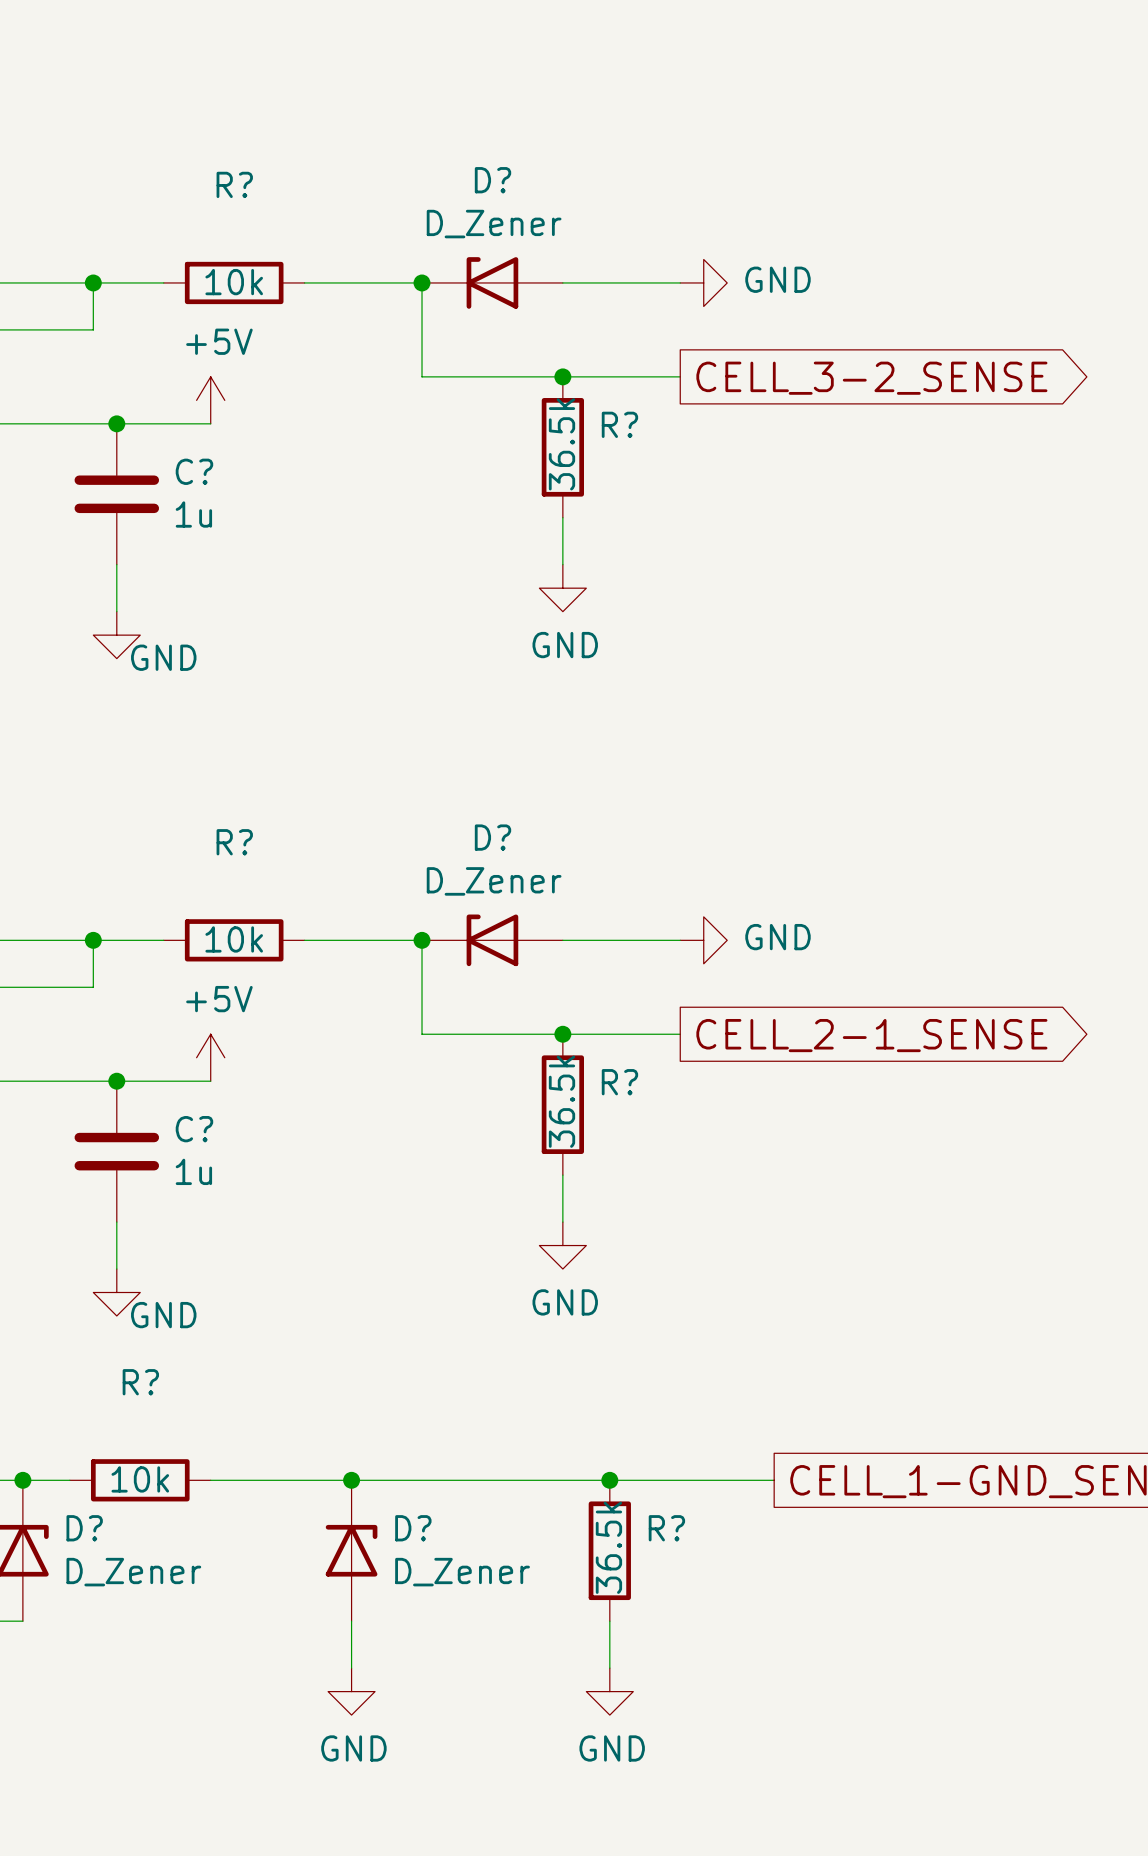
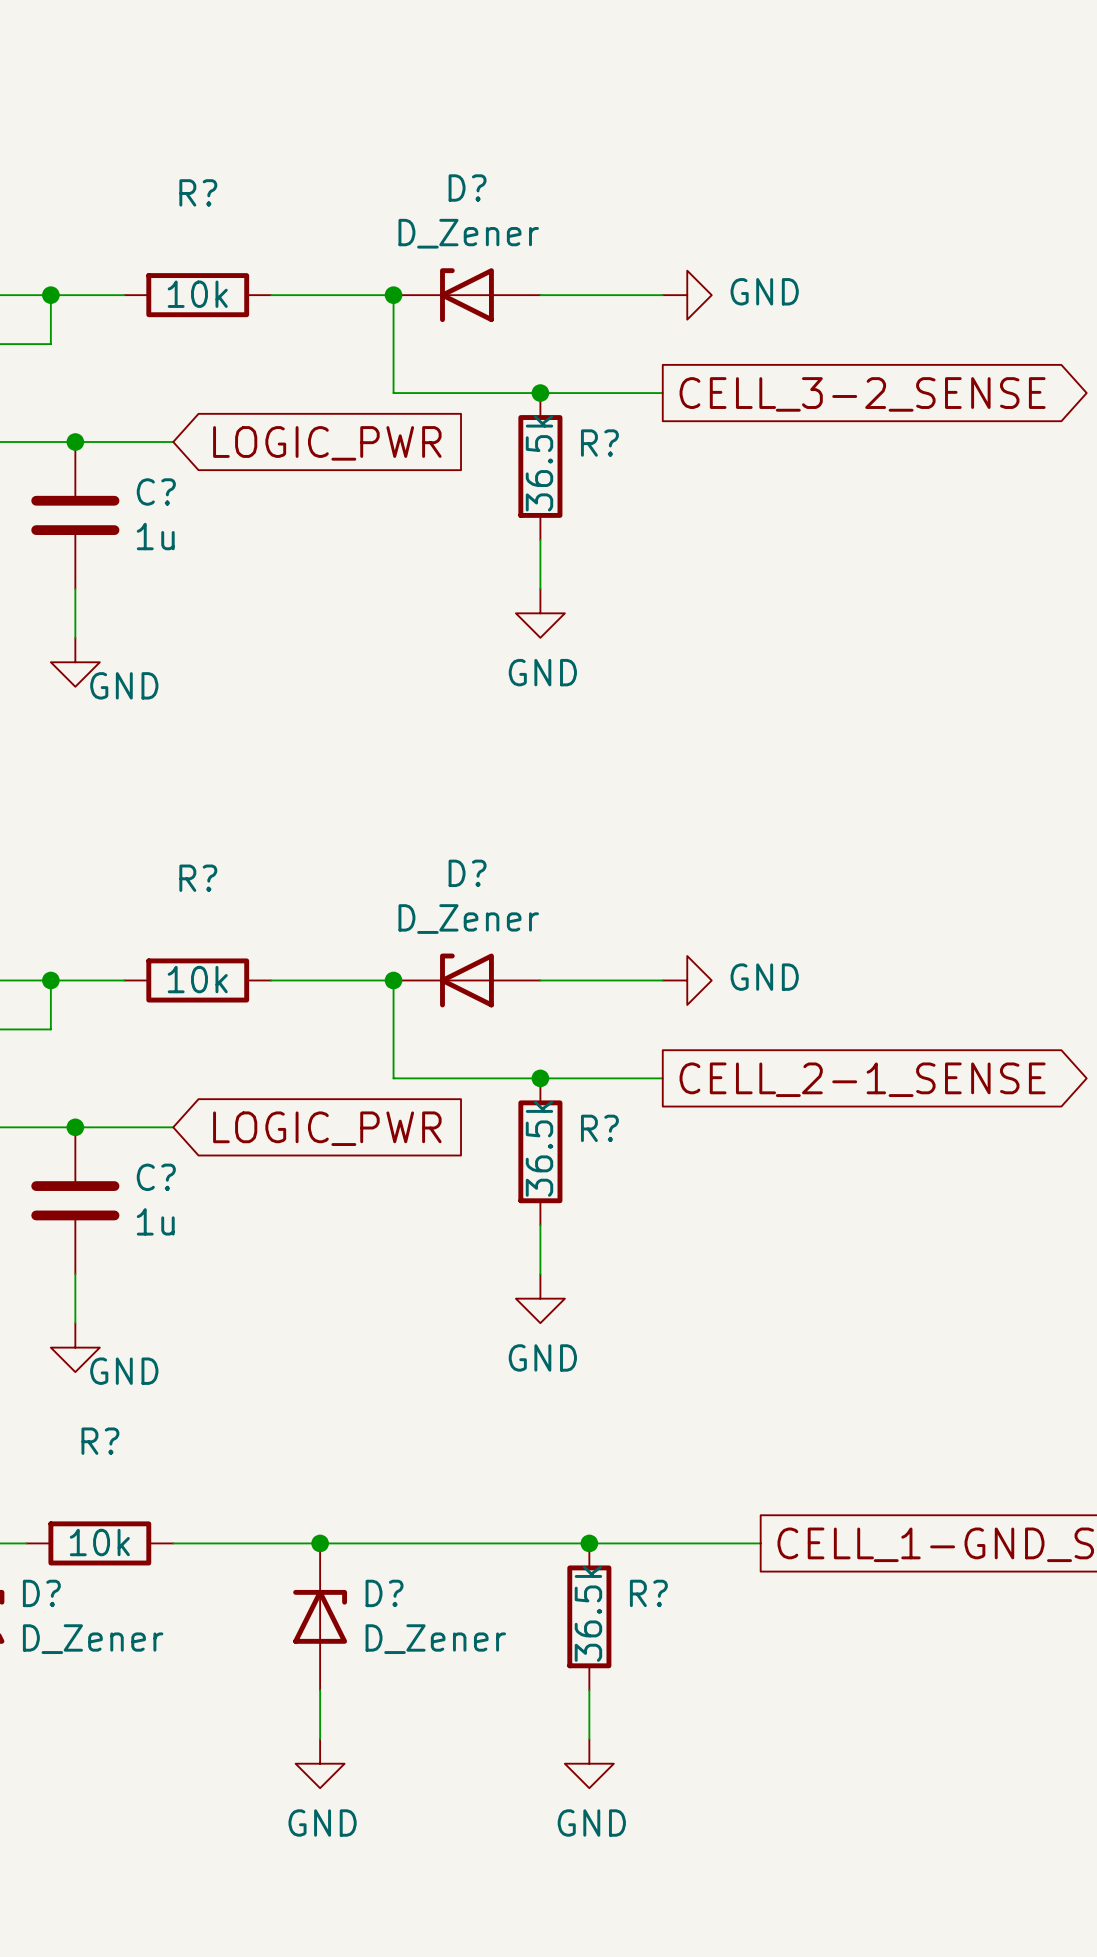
power symbol: +5V (210, 400) -> none
global label: none -> LOGIC_PWR (327, 443)
power symbol: +5V (210, 1057) -> none
global label: none -> LOGIC_PWR (327, 1128)

